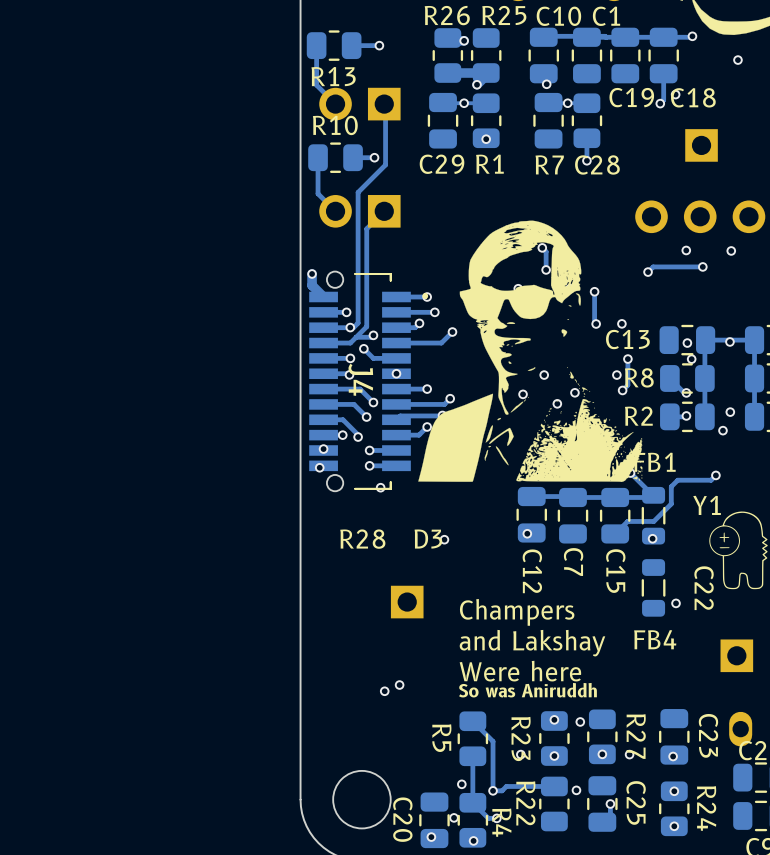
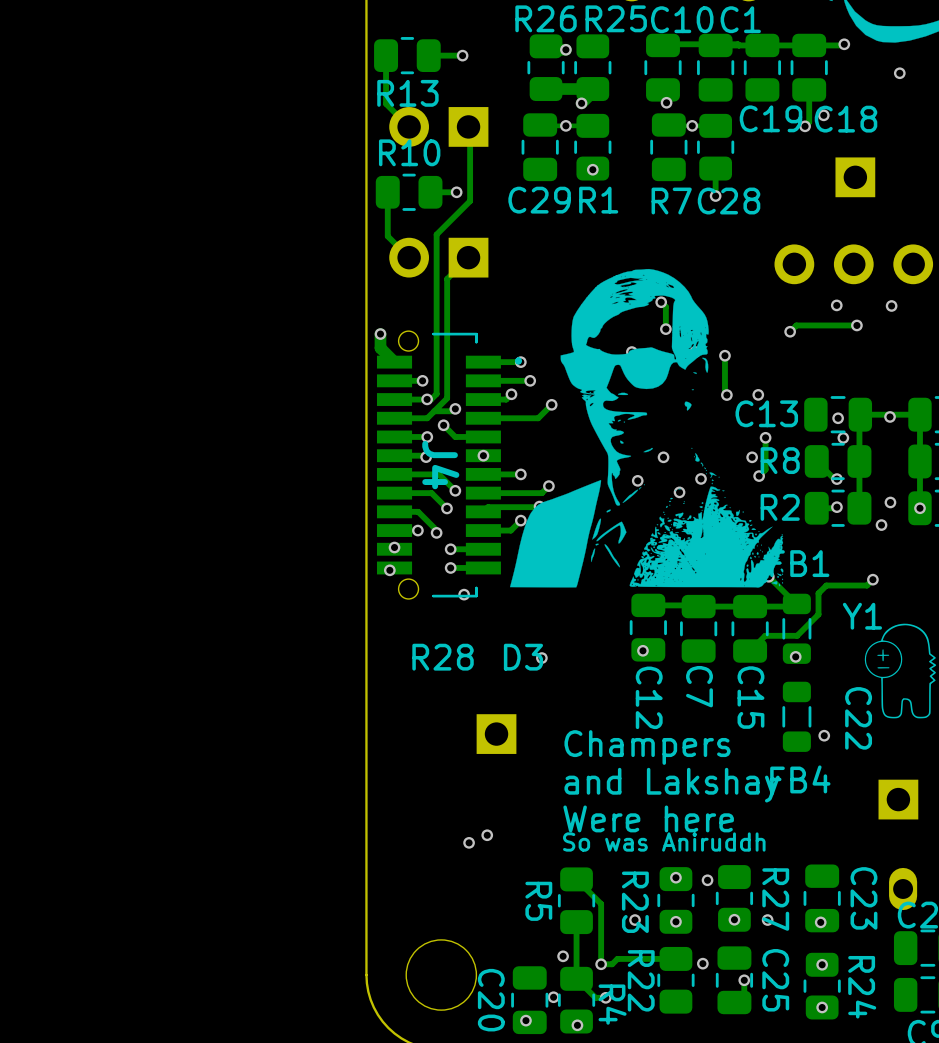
via: none -> (919, 508)

